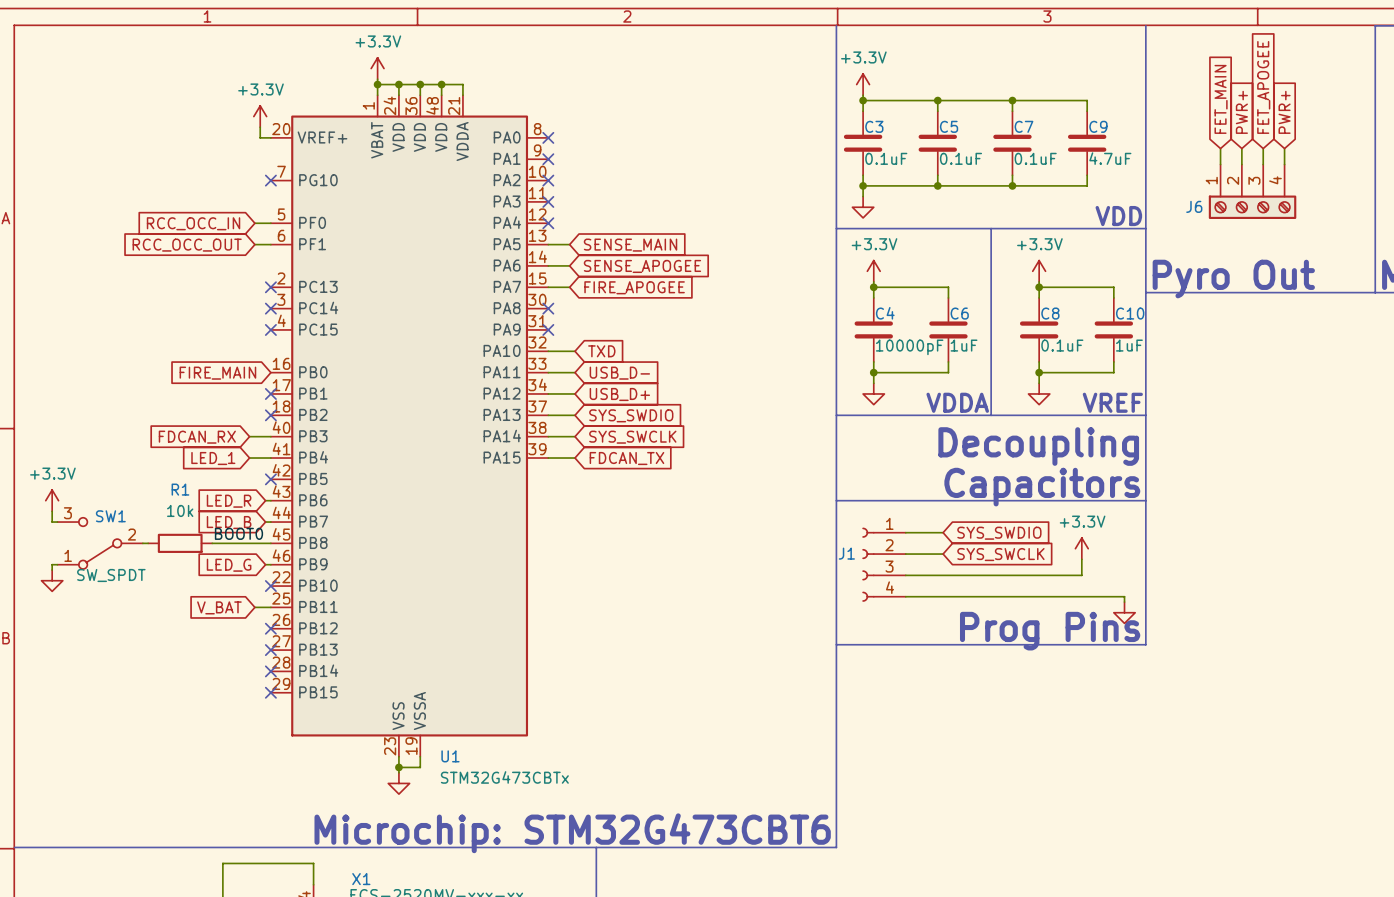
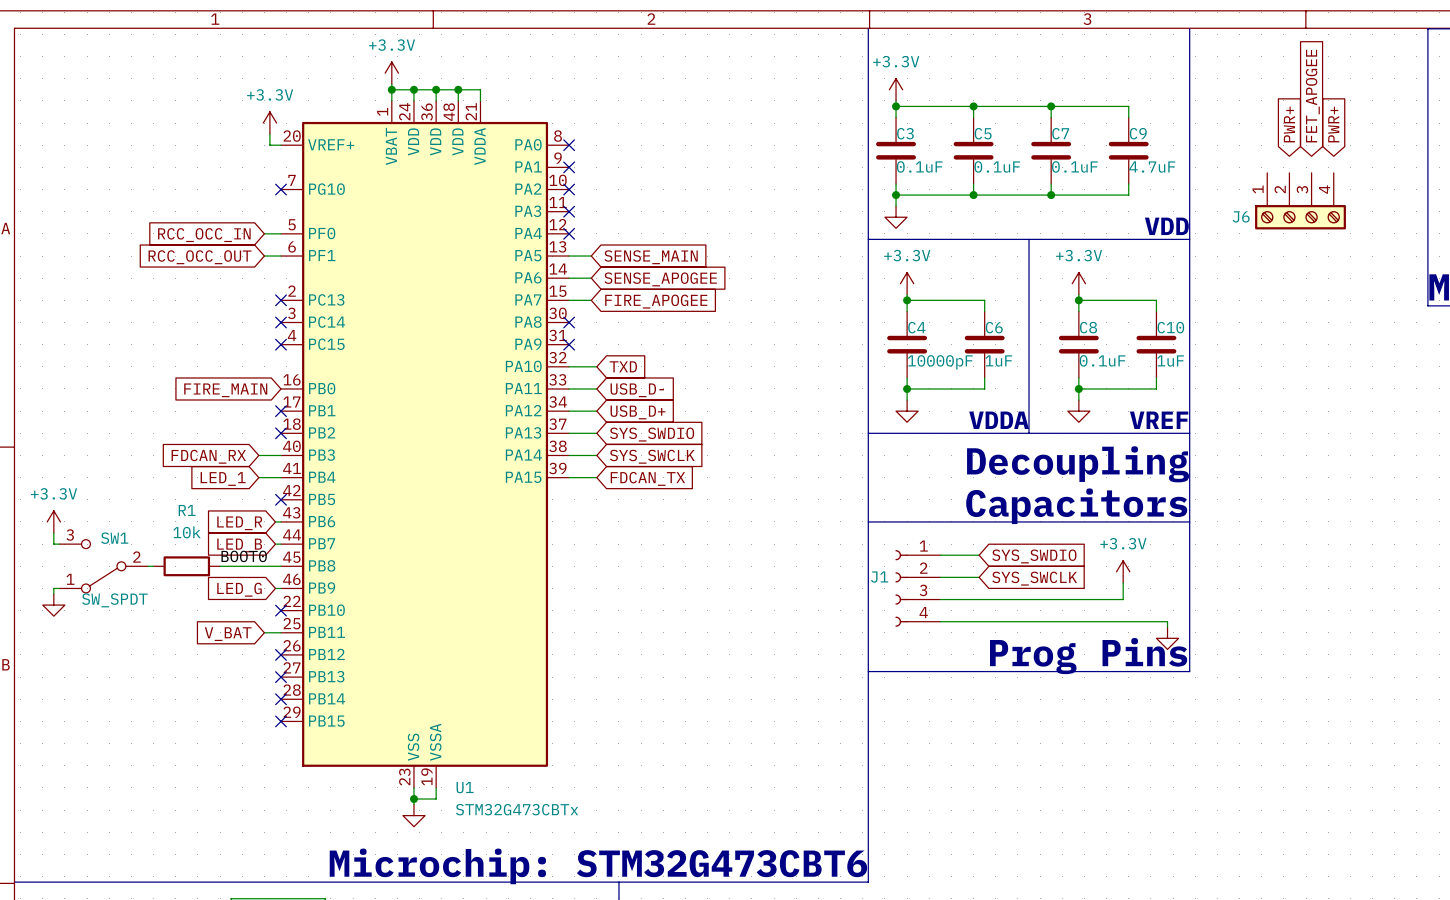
global label: FET_MAIN (1221, 99) -> none
wire: (1220, 148) (1220, 164) -> none
wire: (1241, 148) (1241, 164) -> none
wire: (1263, 148) (1263, 164) -> none
wire: (1284, 148) (1284, 164) -> none
text: Pyro Out (1233, 279) -> none
line: (1145, 292) (1375, 292) -> none

